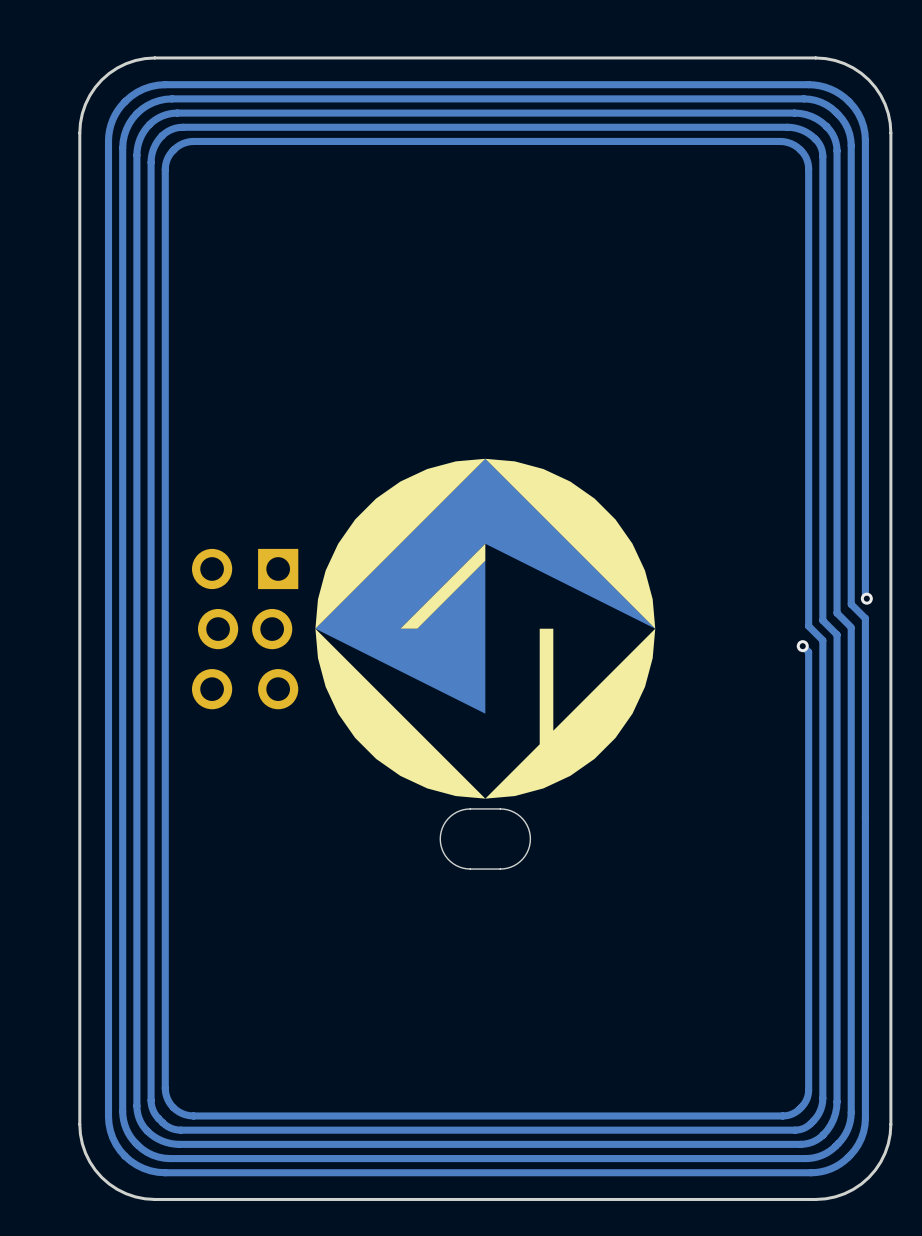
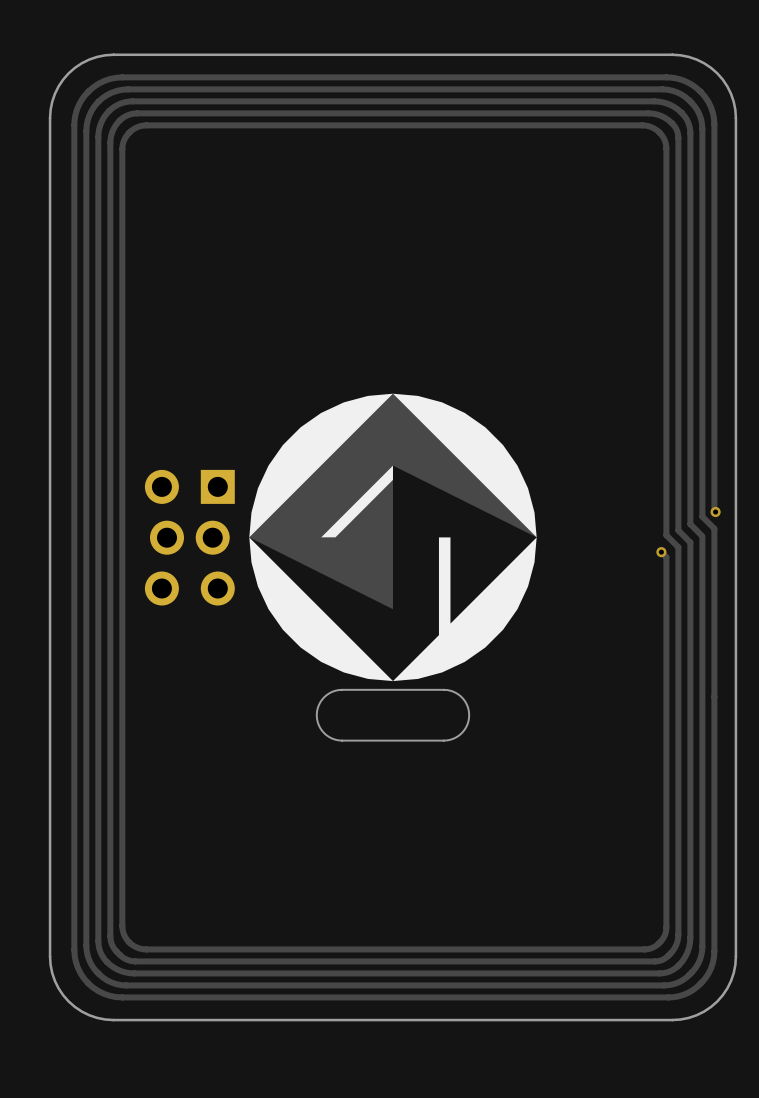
board edge: (470, 808) (459, 810) (447, 819) (442, 828) (440, 839) (442, 849) (450, 861) (459, 867) (470, 869) -> (380, 689) (342, 689) (332, 691) (322, 699) (316, 715) (322, 730) (332, 738) (342, 740) (380, 740)
board edge: (500, 808) (514, 812) (522, 819) (528, 828) (530, 839) (528, 849) (522, 858) (511, 867) (500, 869) -> (405, 689) (452, 691) (464, 700) (469, 715) (464, 729) (452, 738) (405, 740)

